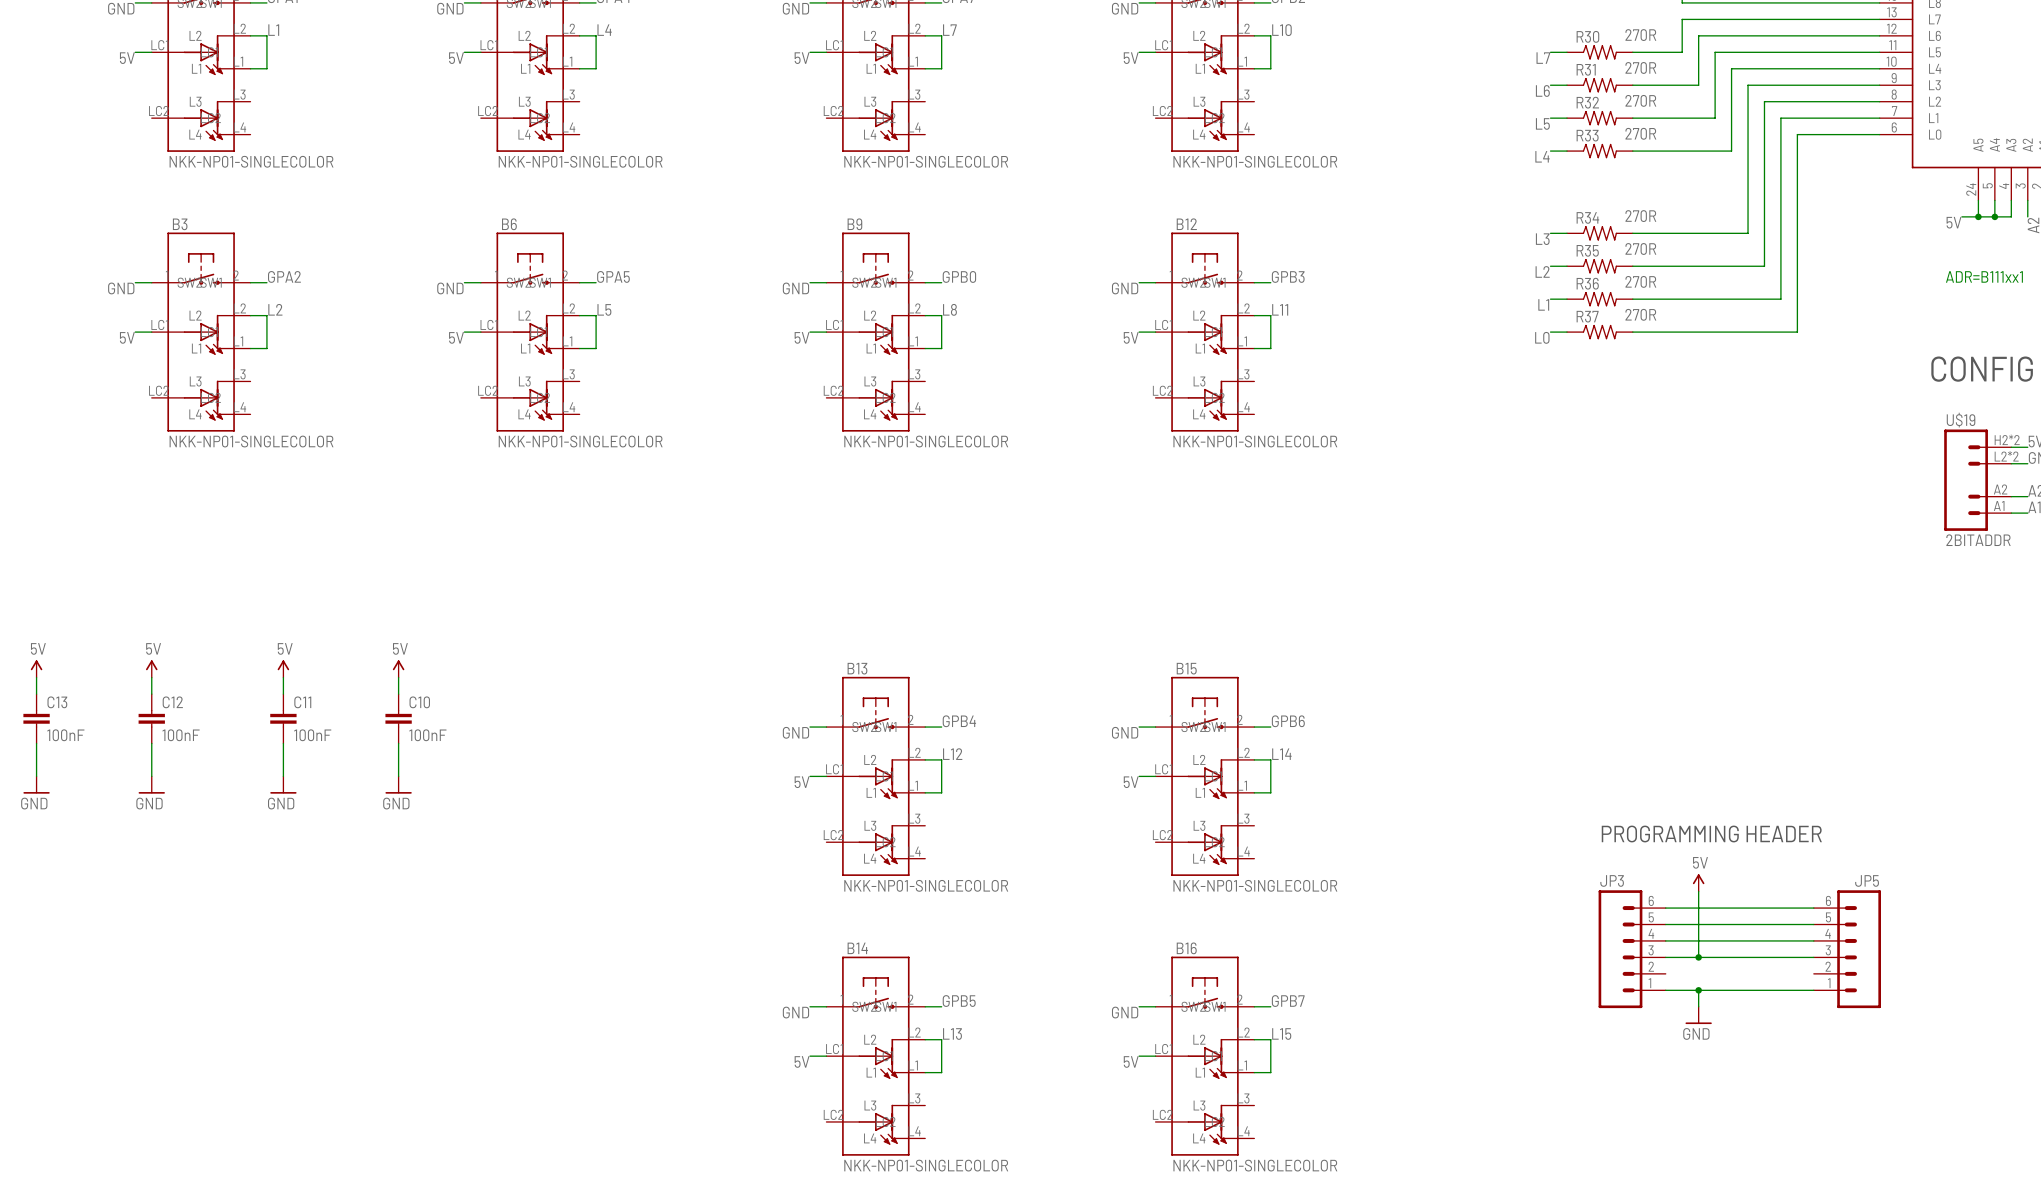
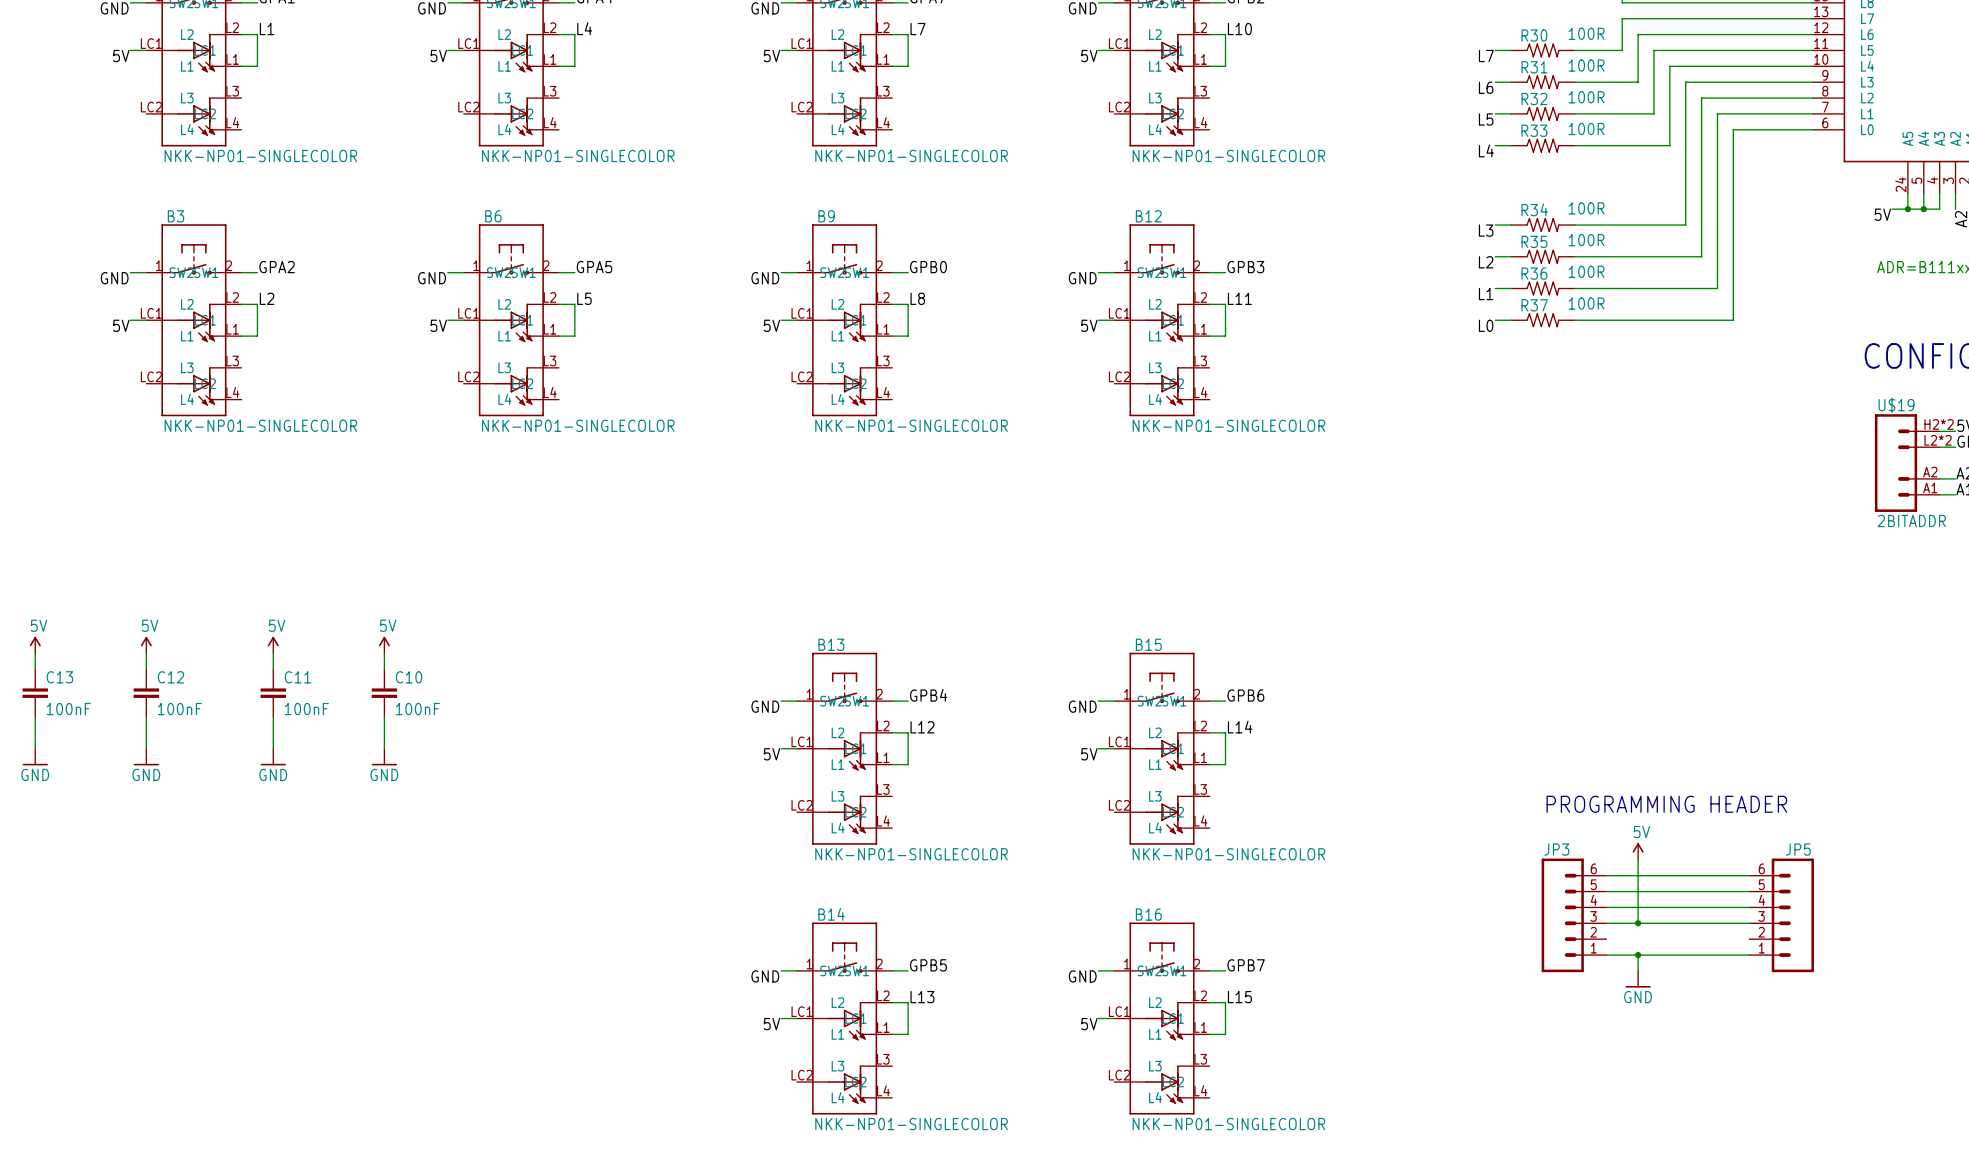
R30 value: 270R (1640, 35) -> 100R (1586, 33)
R31 value: 270R (1640, 67) -> 100R (1586, 65)
R32 value: 270R (1640, 100) -> 100R (1586, 97)
R33 value: 270R (1640, 133) -> 100R (1586, 129)
R34 value: 270R (1640, 216) -> 100R (1586, 208)
R35 value: 270R (1640, 248) -> 100R (1586, 240)
R36 value: 270R (1640, 281) -> 100R (1586, 271)
R37 value: 270R (1640, 314) -> 100R (1586, 303)

